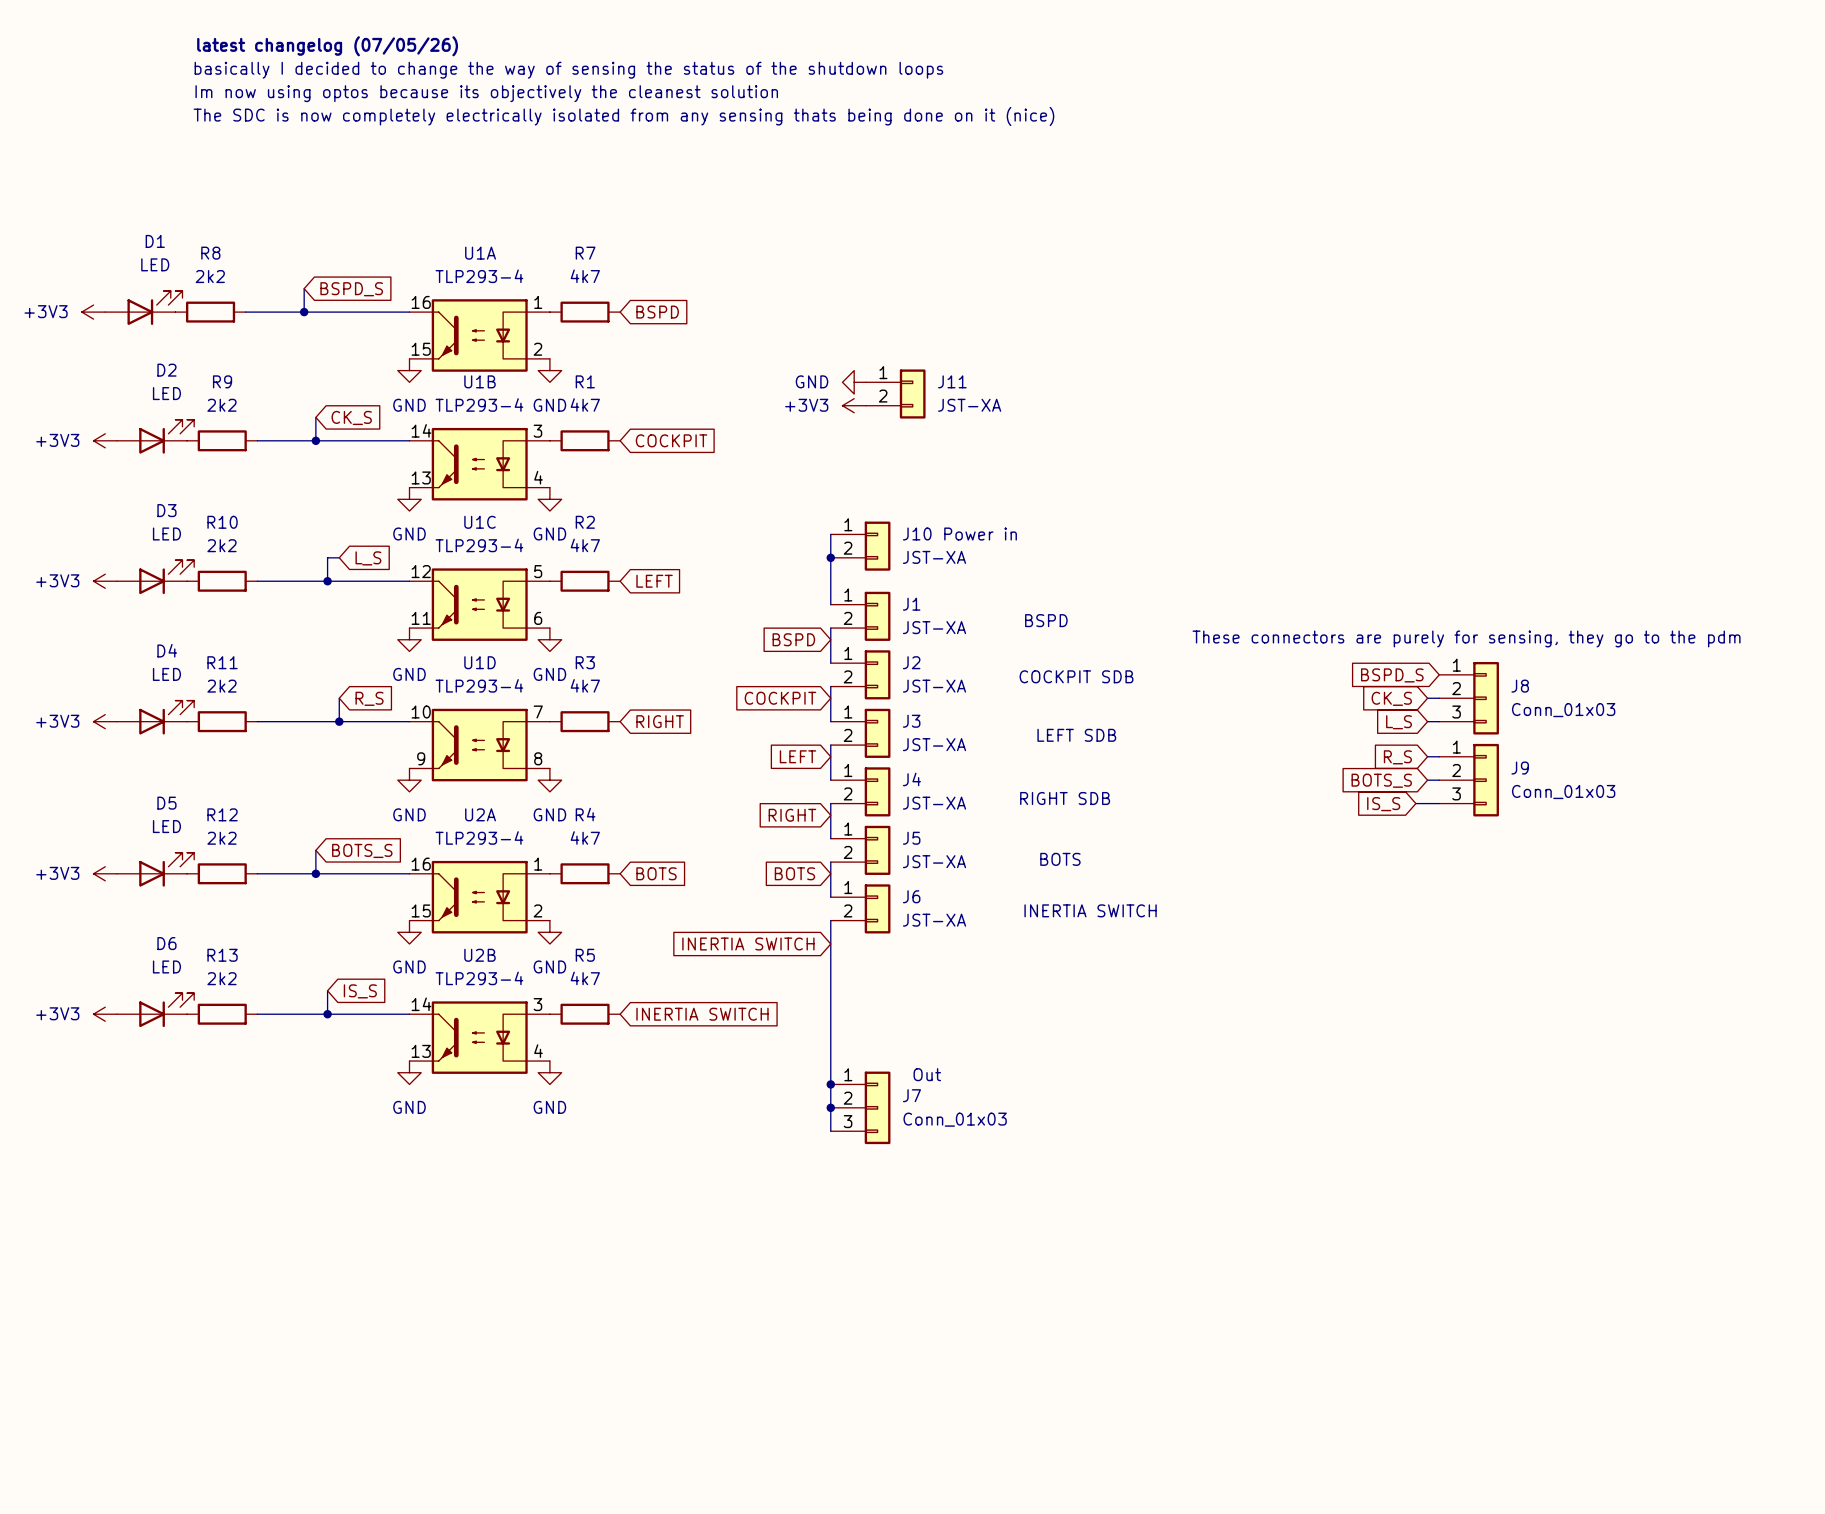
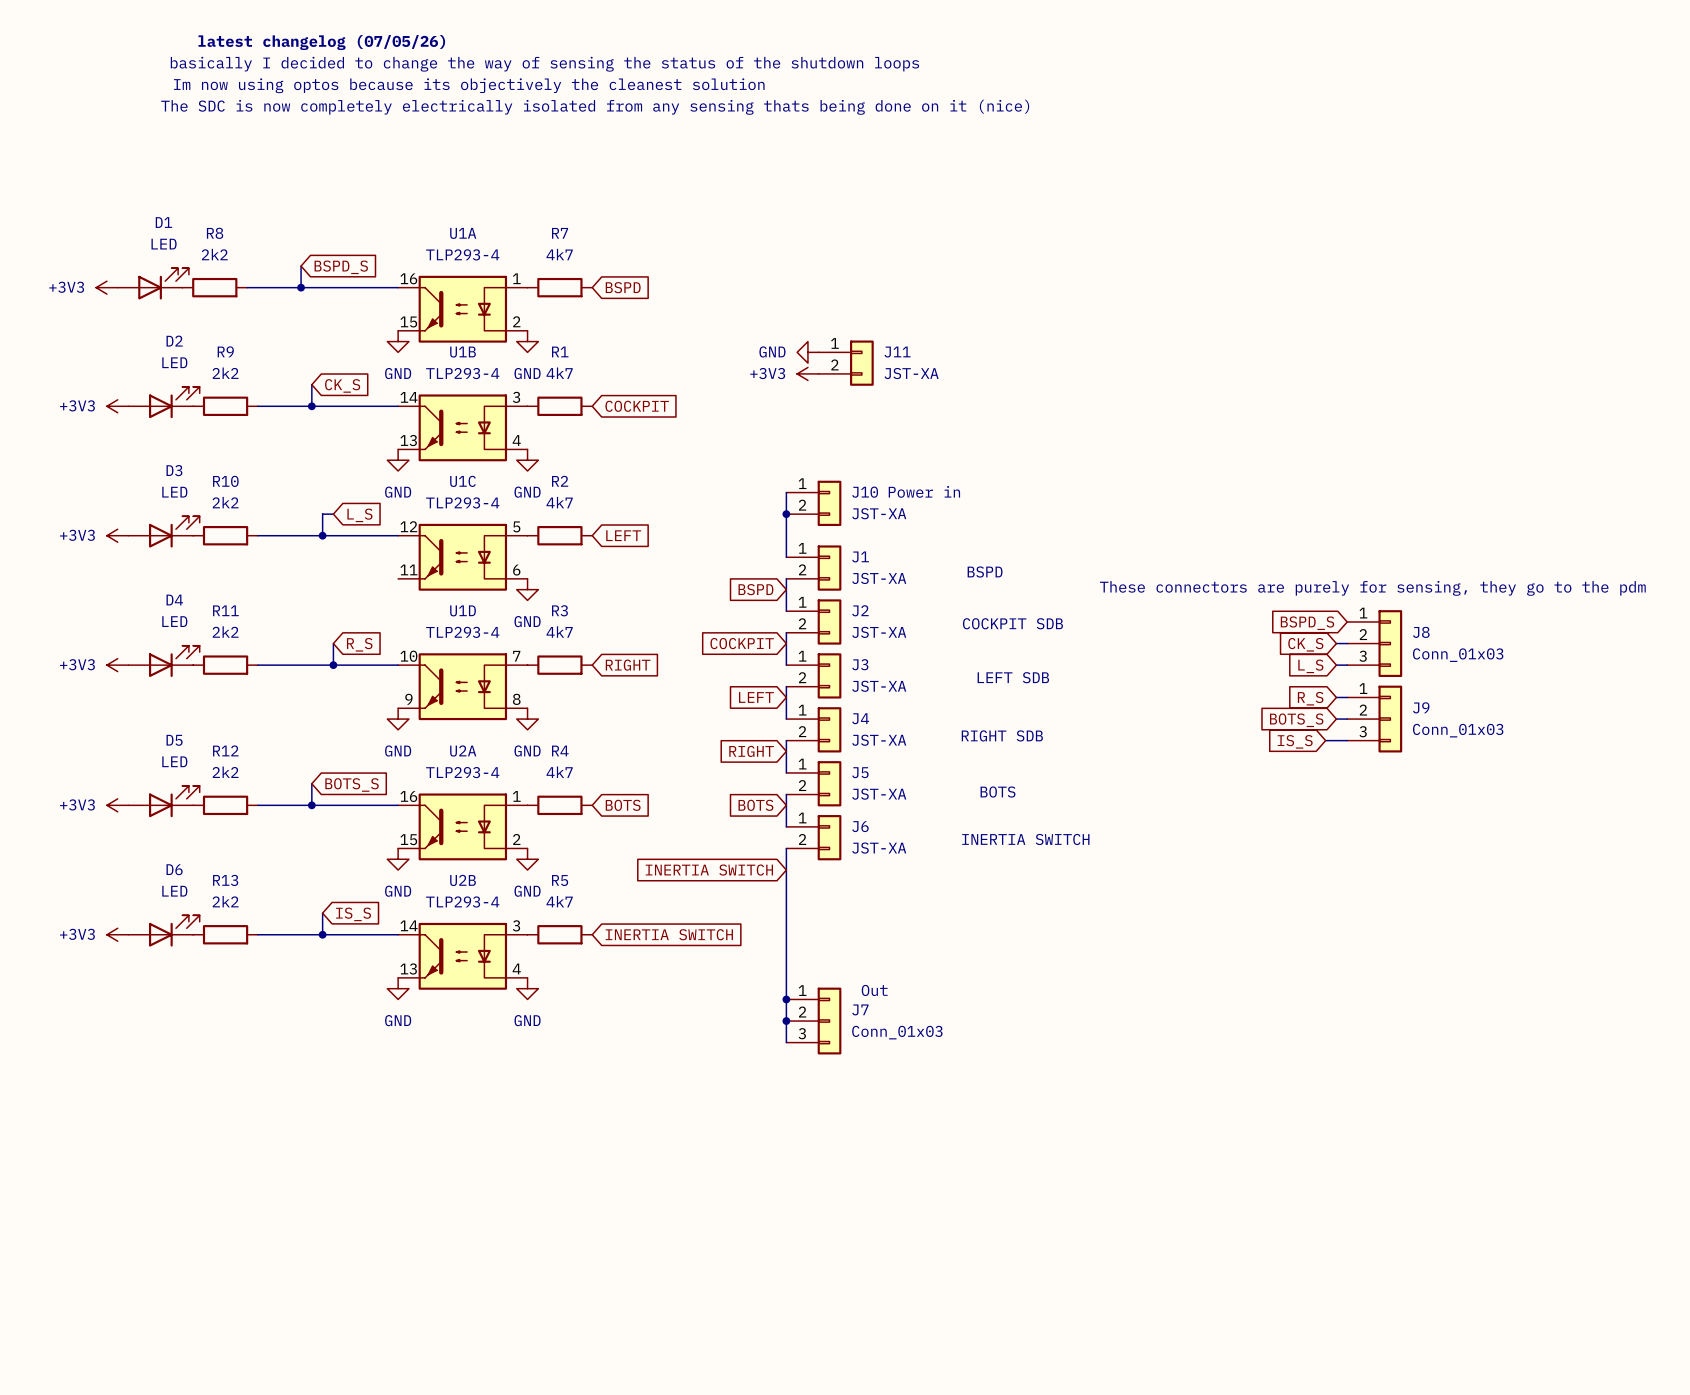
power symbol: GND (409, 639) -> none

